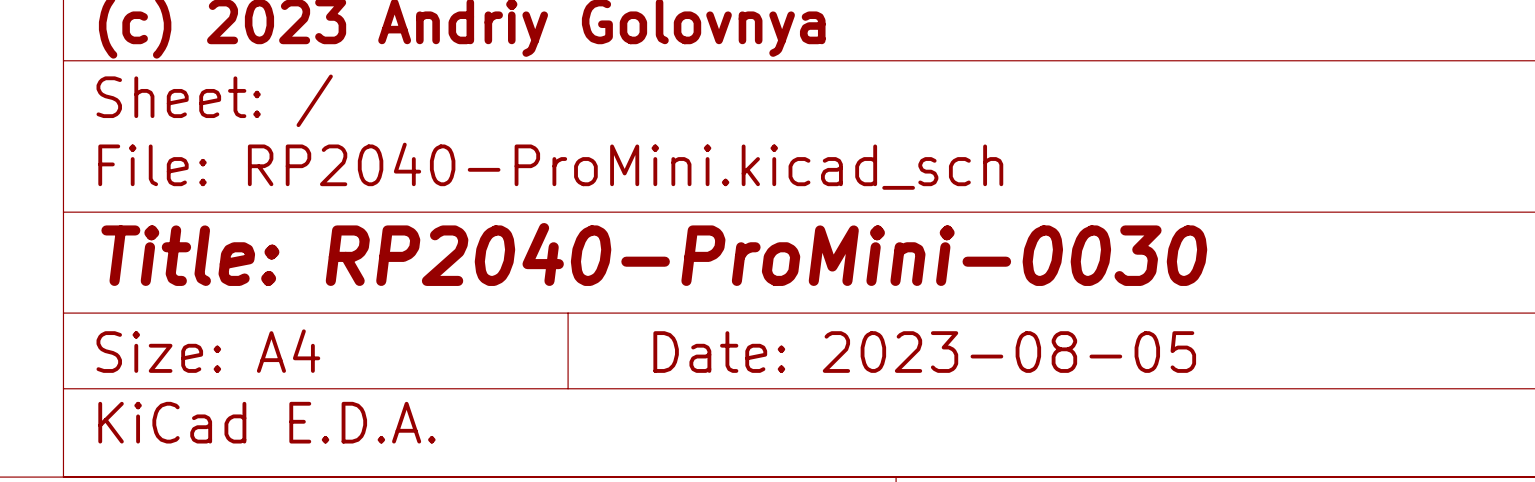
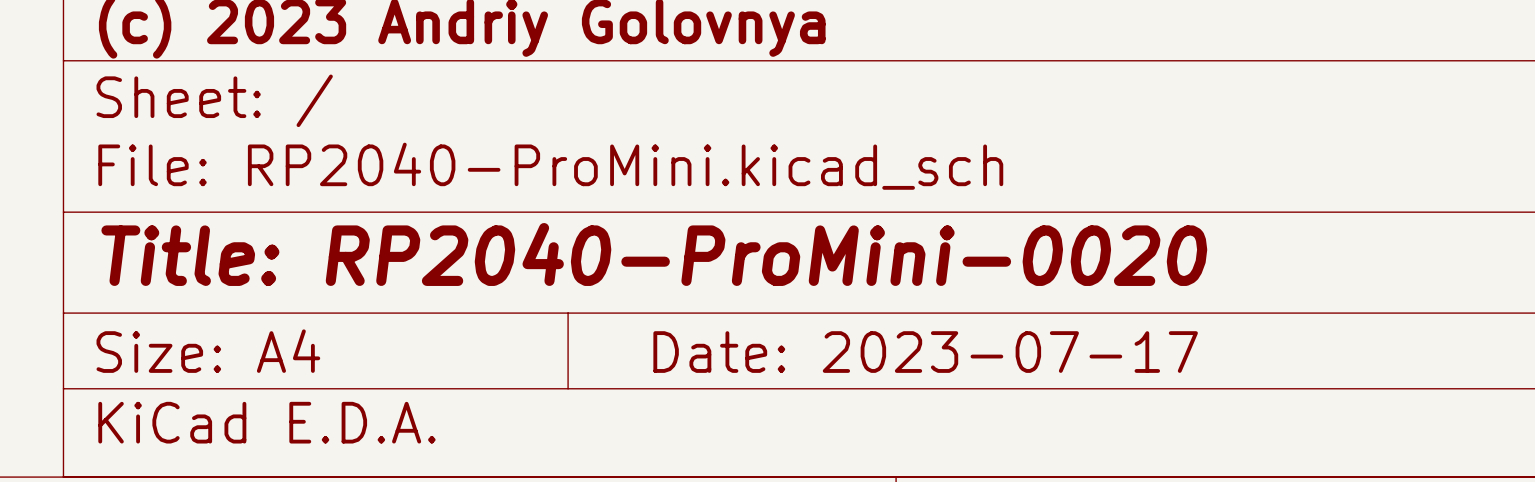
title block: Title: RP2040-ProMini-0030 (654, 254) -> Title: RP2040-ProMini-0020 (654, 254)
title block: Date: 2023-08-05 (924, 352) -> Date: 2023-07-17 (925, 352)

